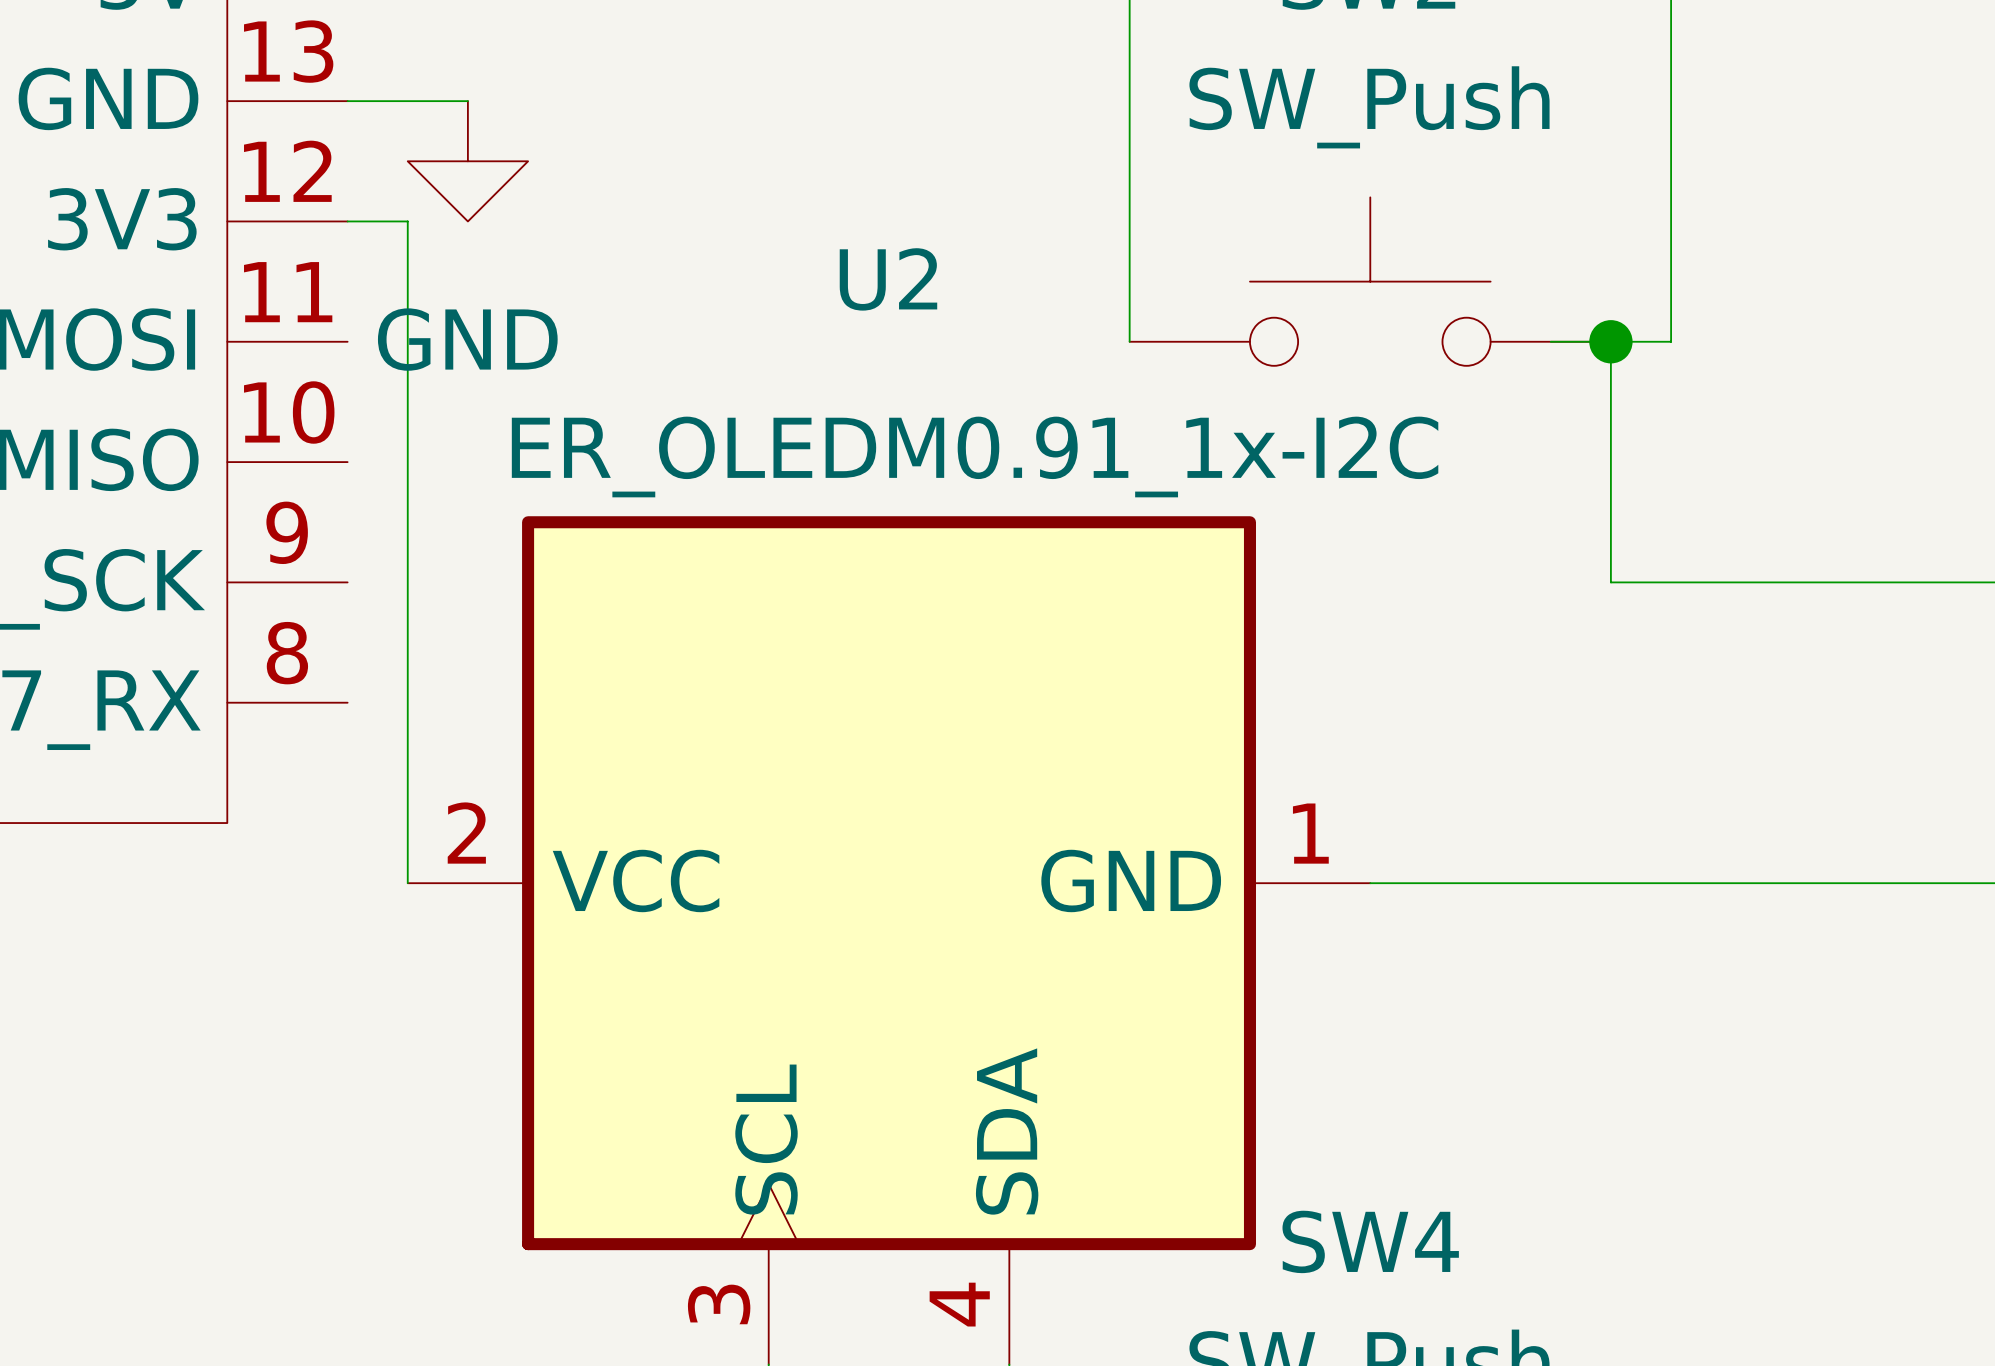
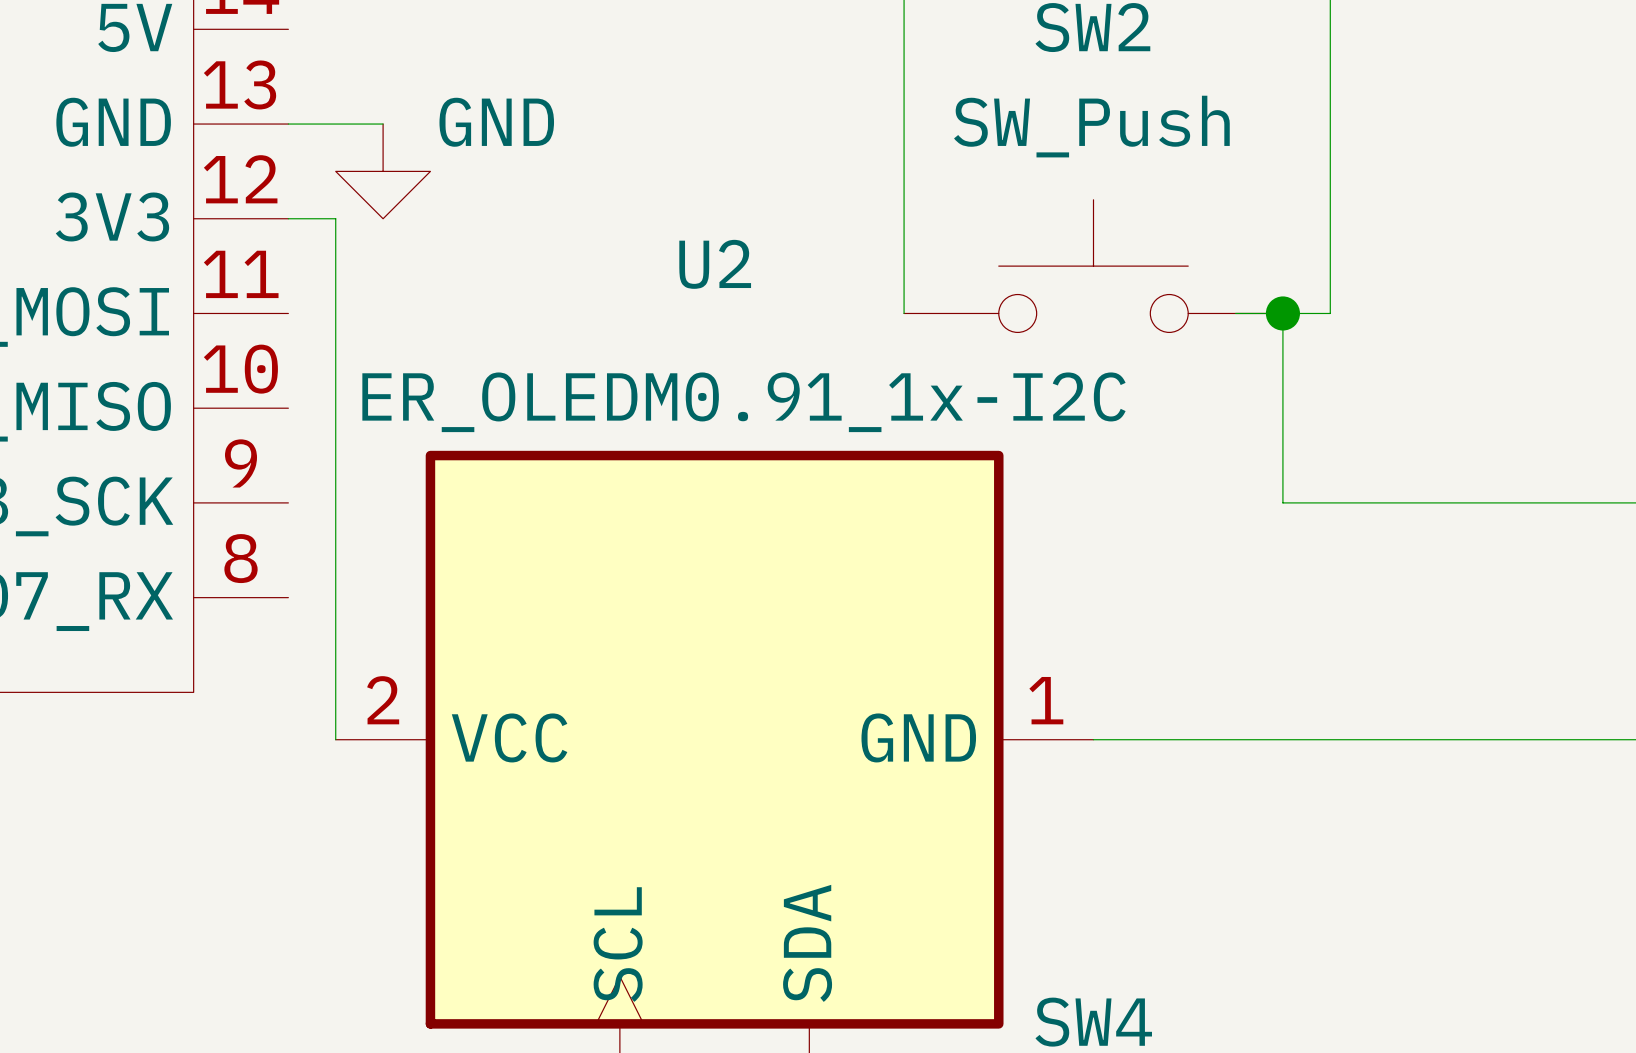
power symbol text position: GND (467, 339) -> GND (496, 122)
U2 value position: ER_OLEDM0.91_1x-I2C (975, 456) -> ER_OLEDM0.91_1x-I2C (743, 402)

